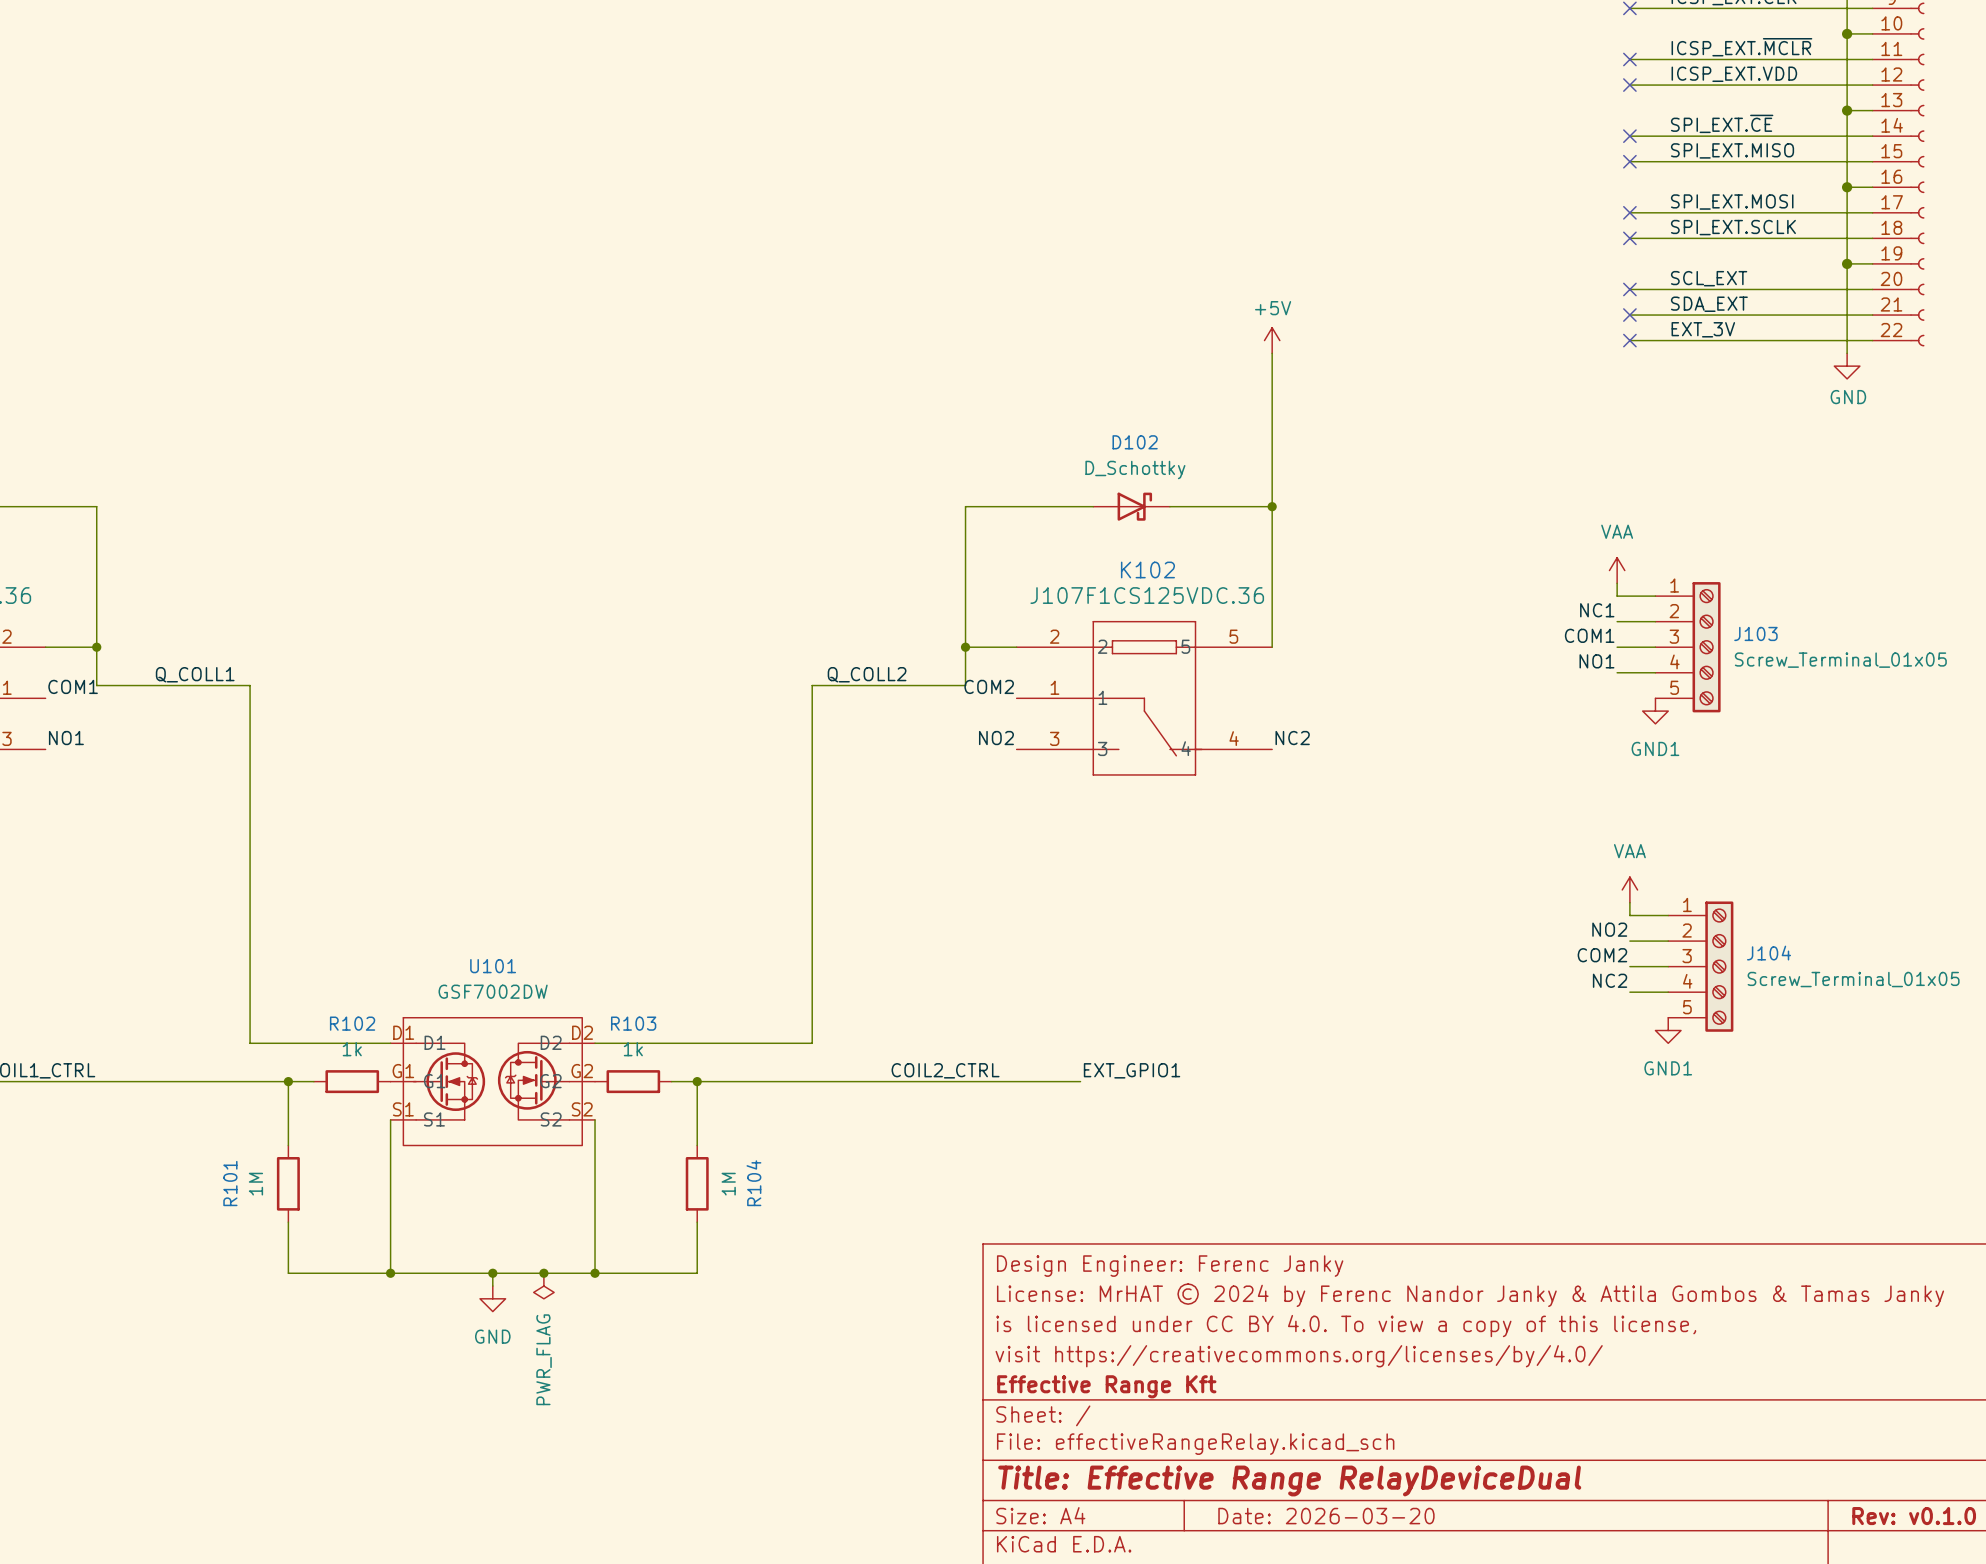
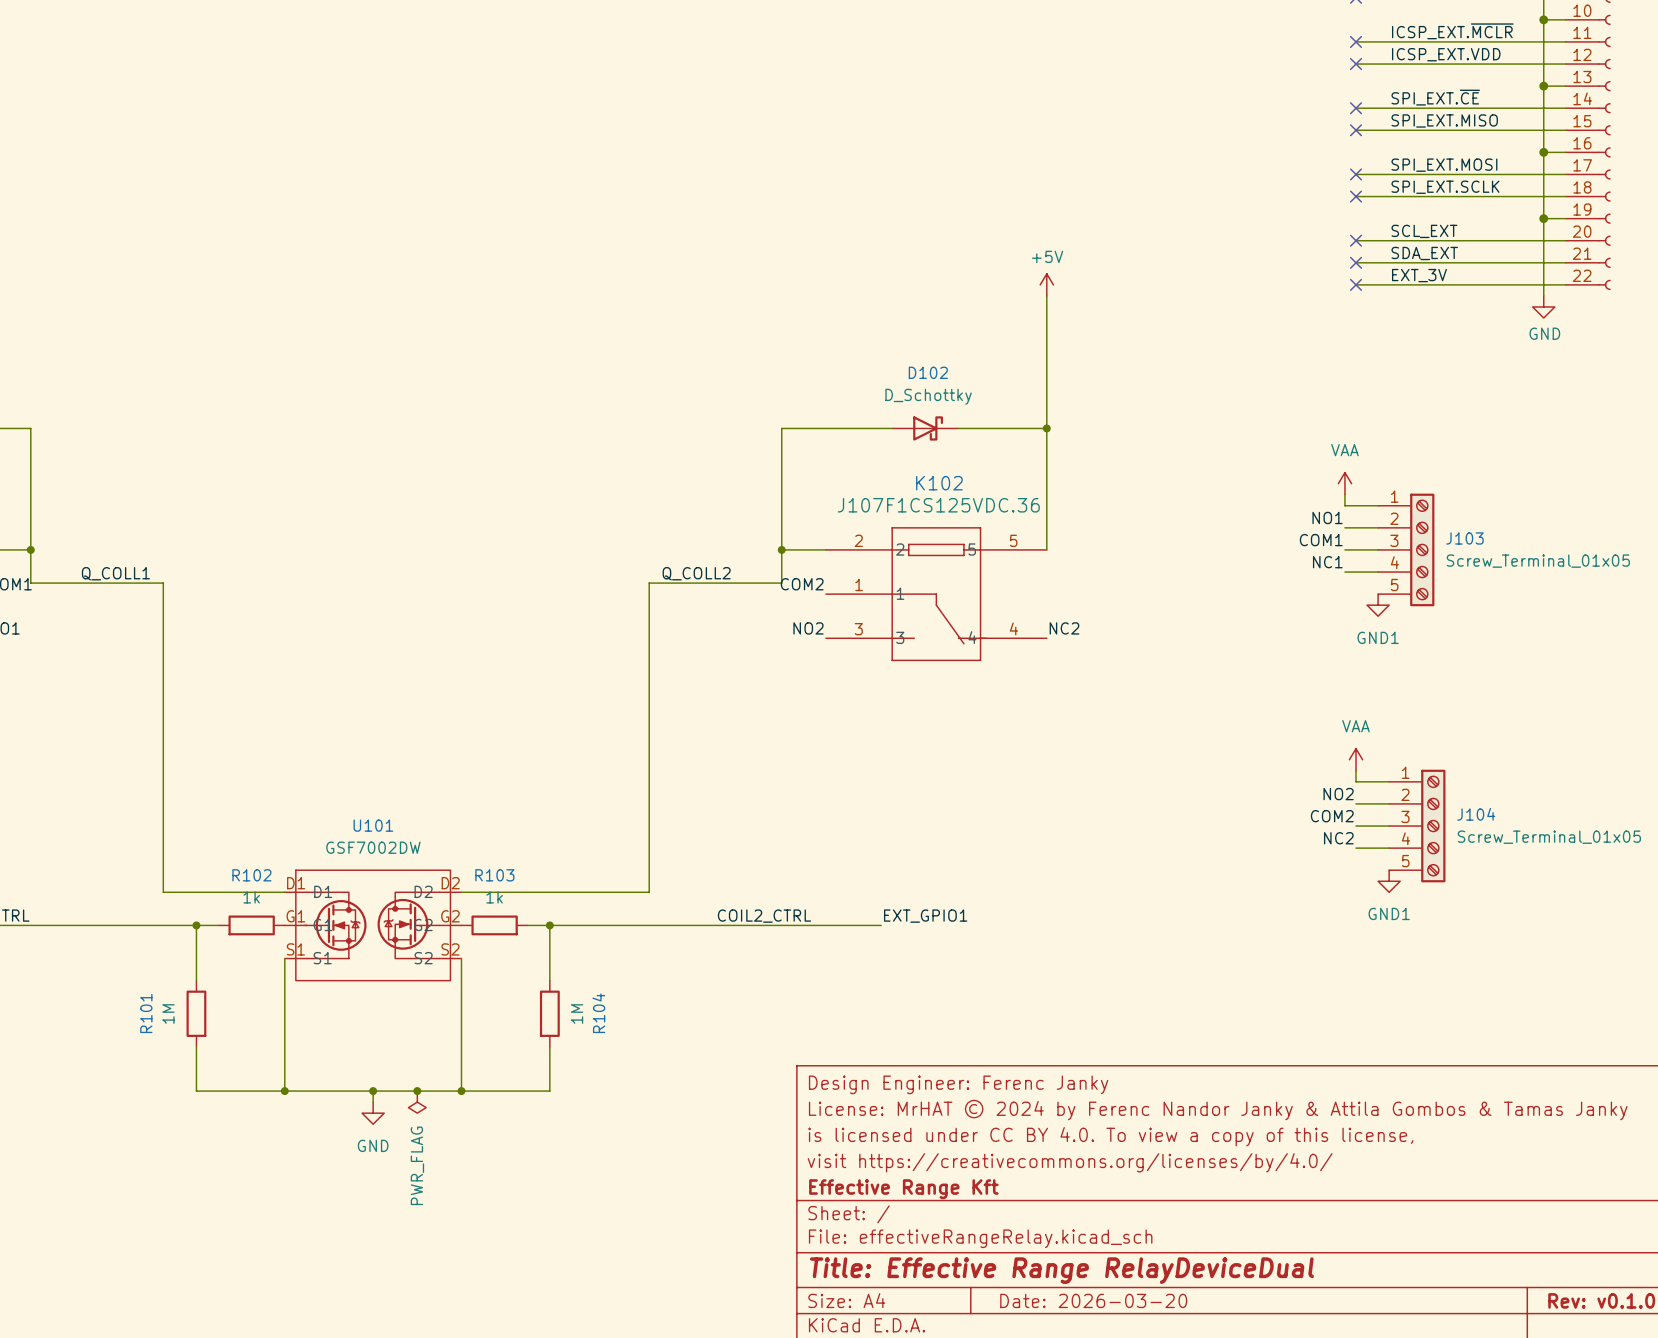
label: NC1 (1597, 610) -> NO1 (1327, 518)
label: NO1 (1596, 661) -> NC1 (1327, 562)

